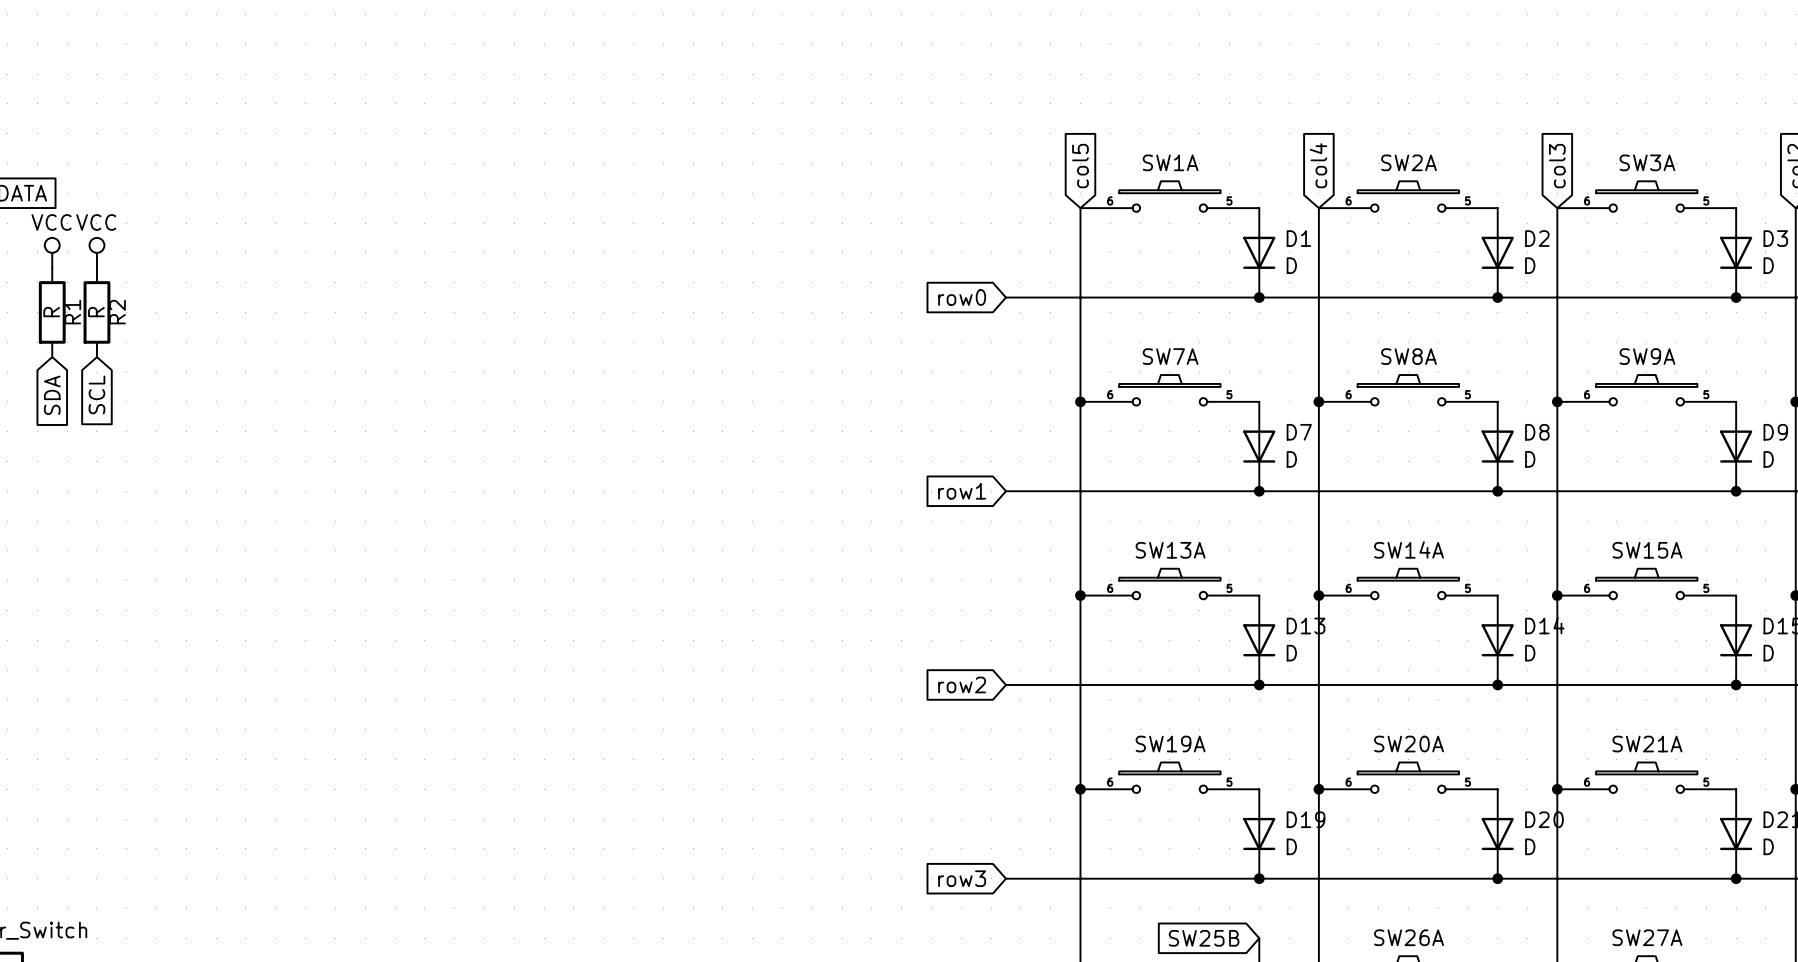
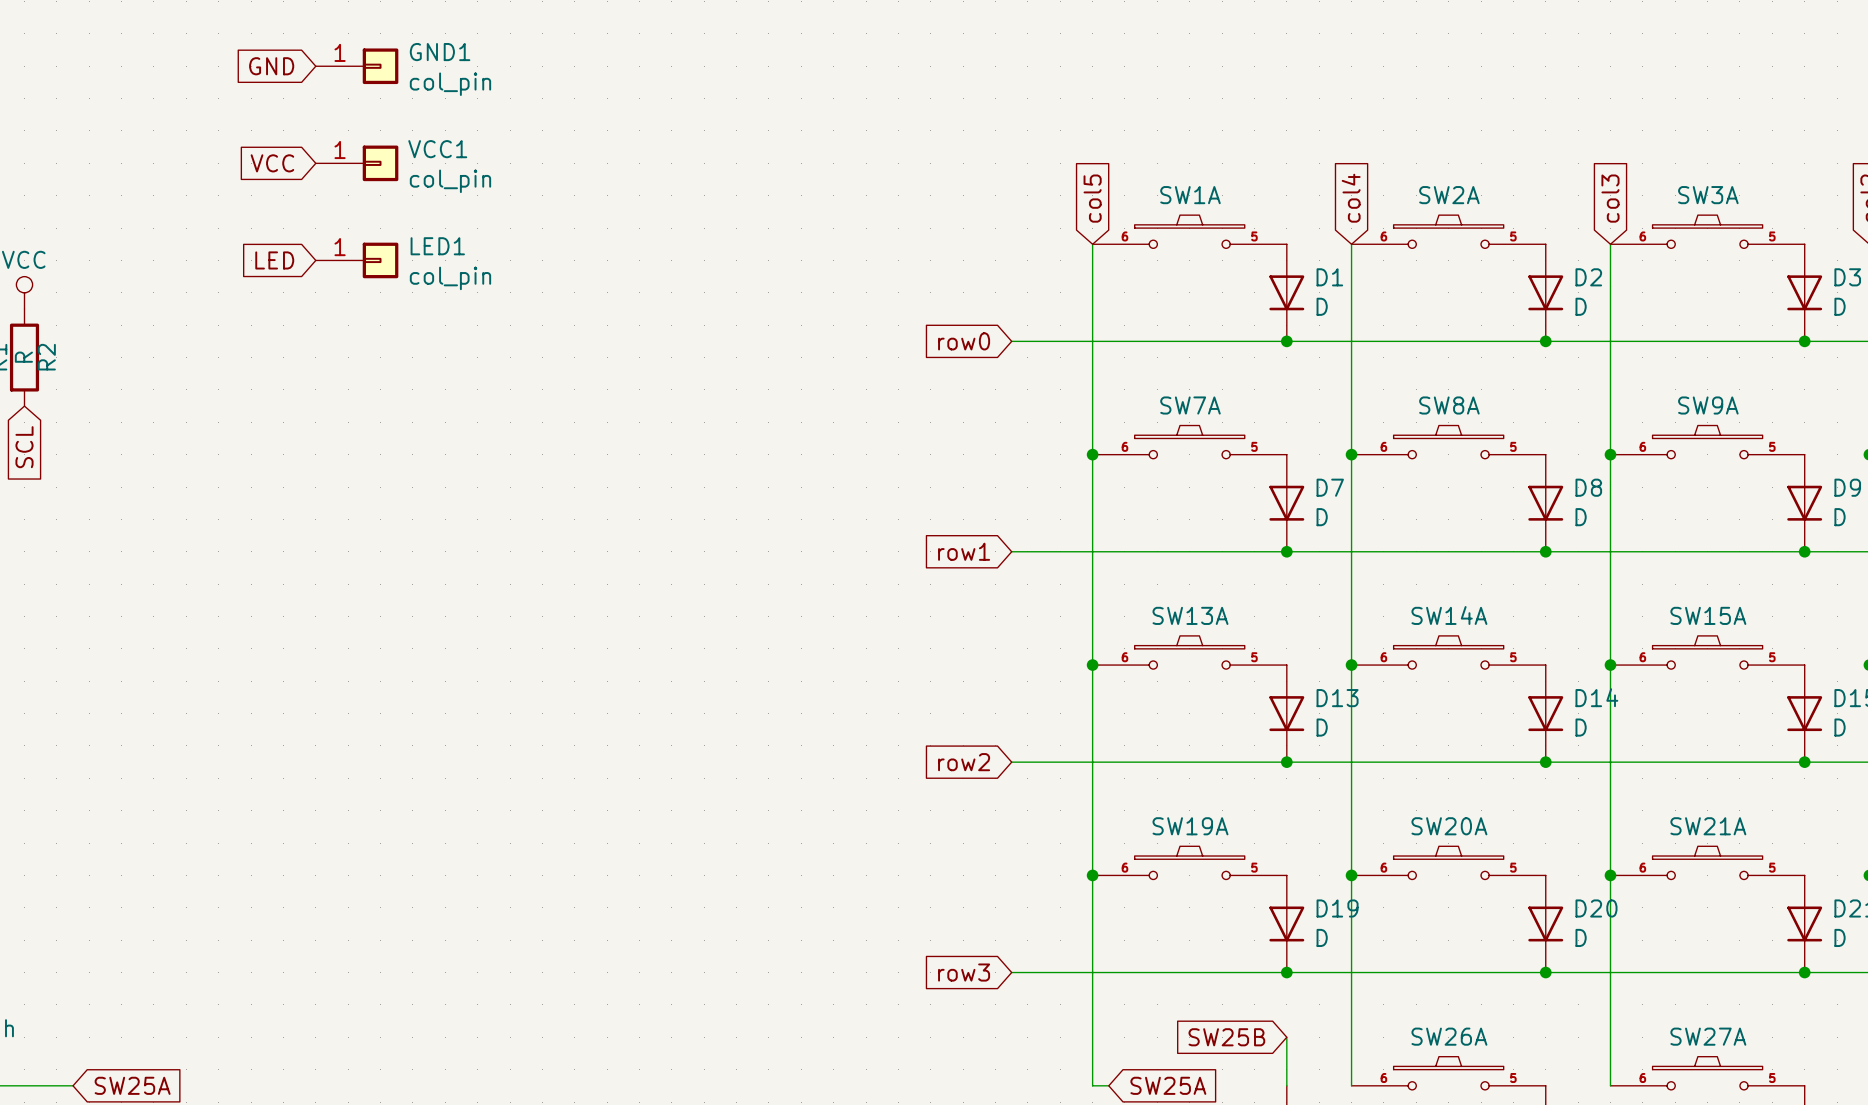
global label: none -> GND (271, 66)
GND1: none -> col_pin (357, 66)
global label: none -> VCC (272, 163)
VCC1: none -> col_pin (357, 163)
global label: none -> LED (274, 260)
LED1: none -> col_pin (357, 260)

